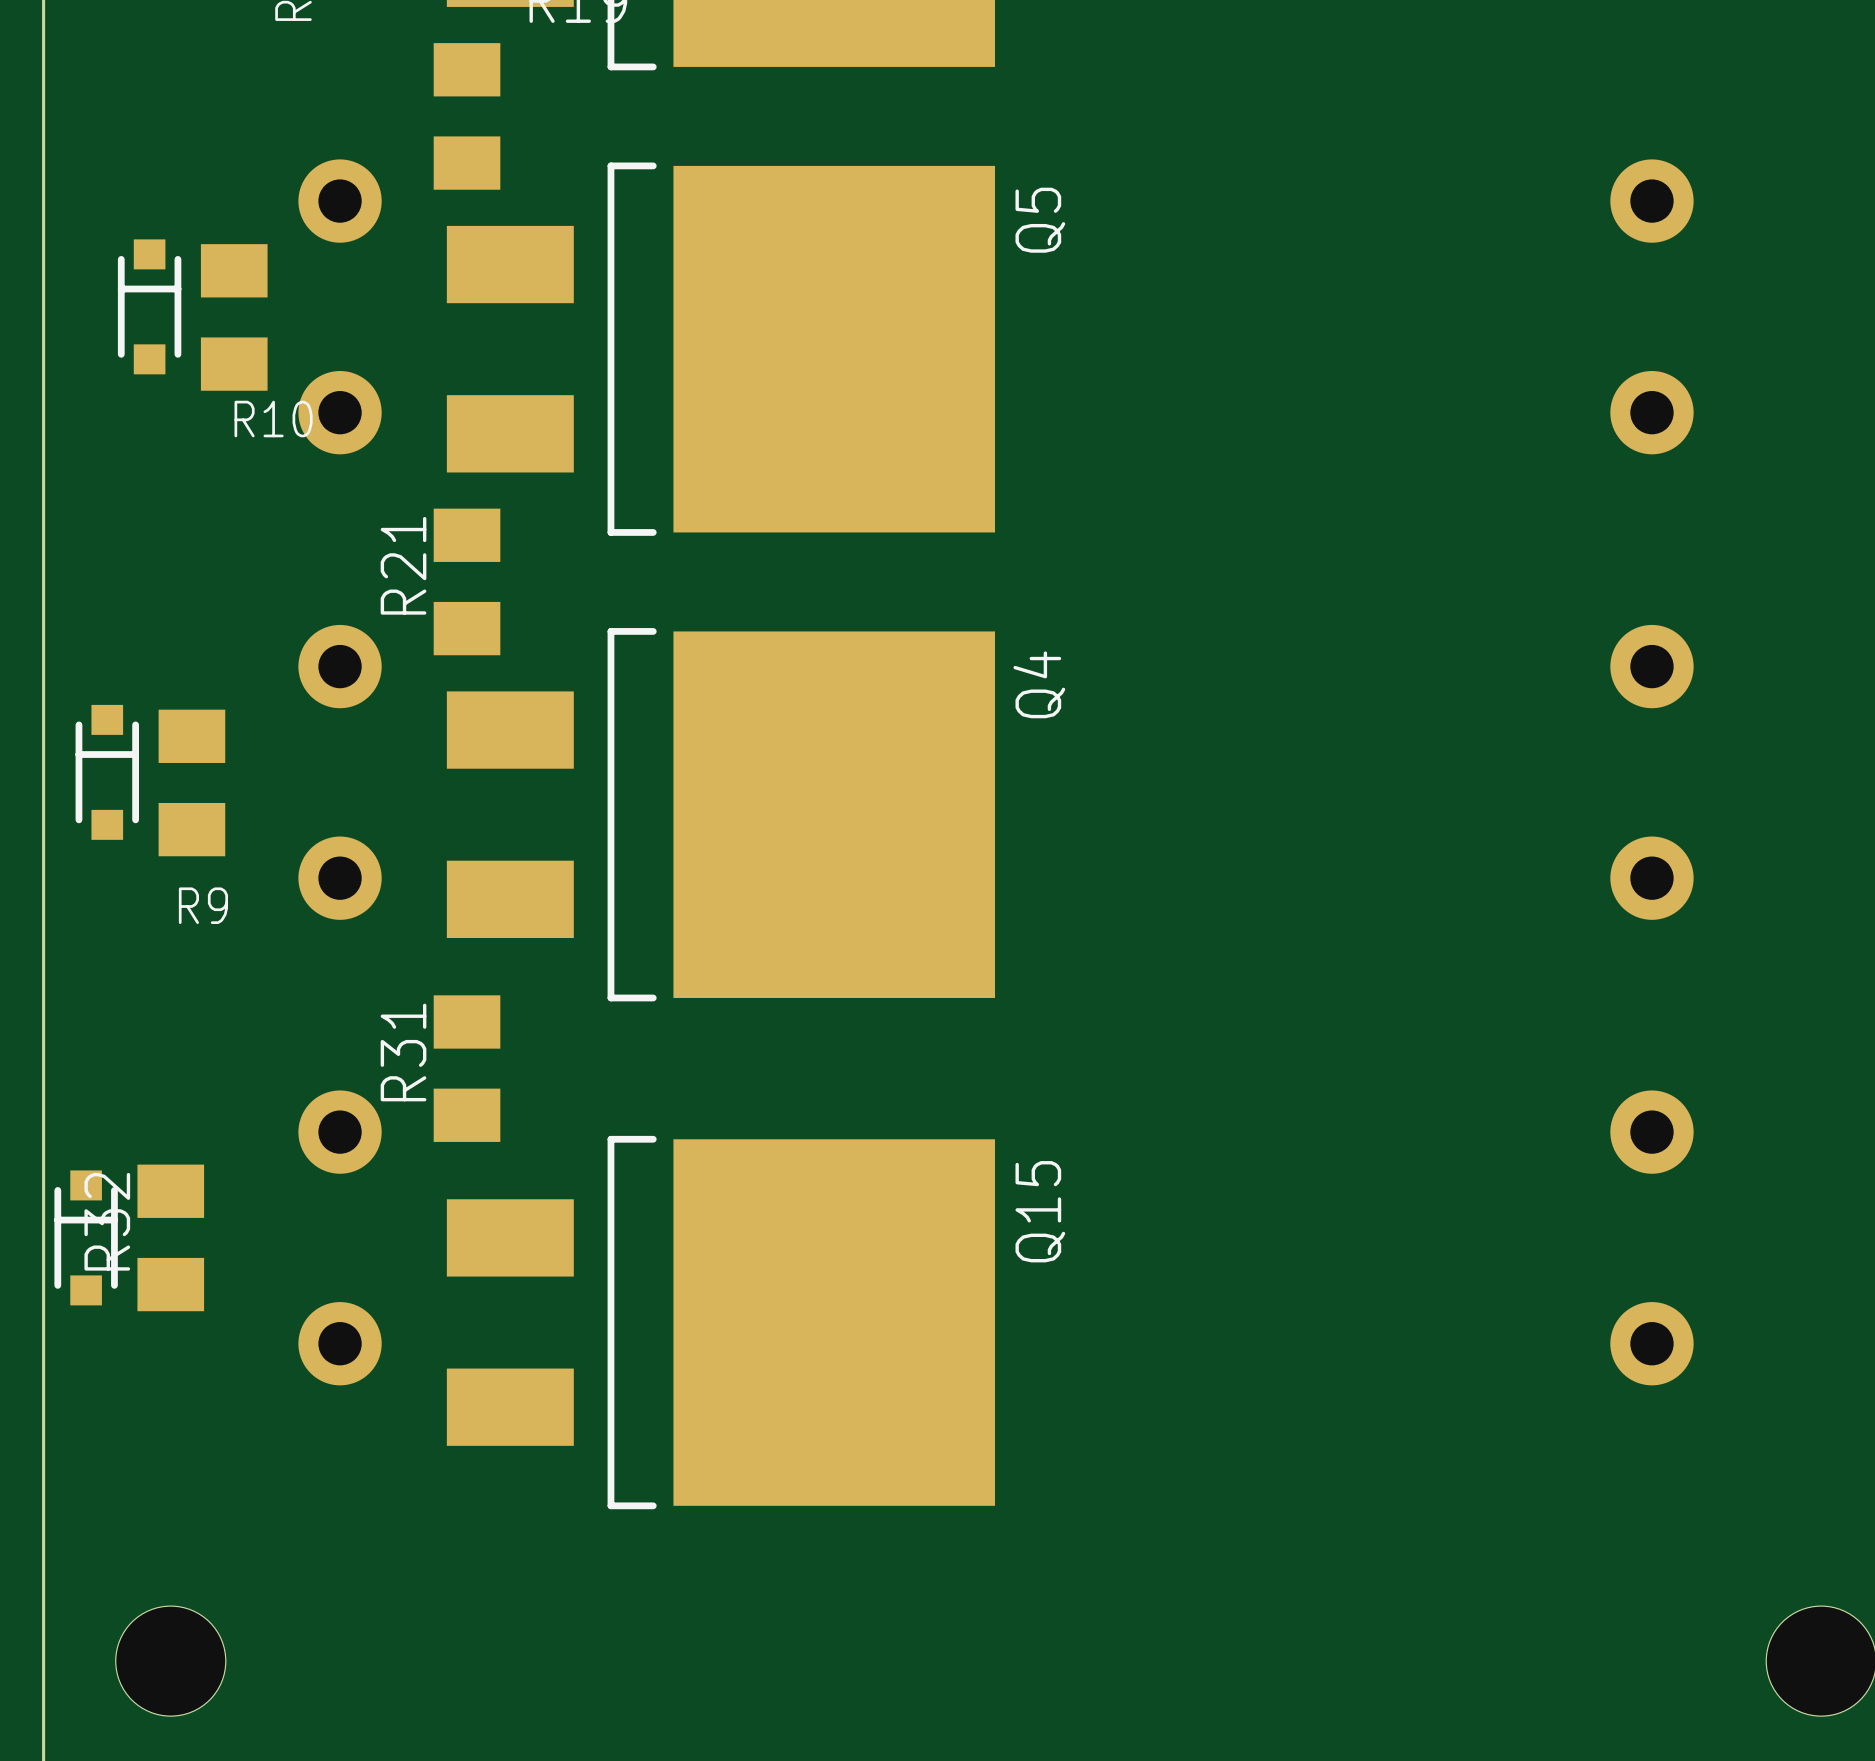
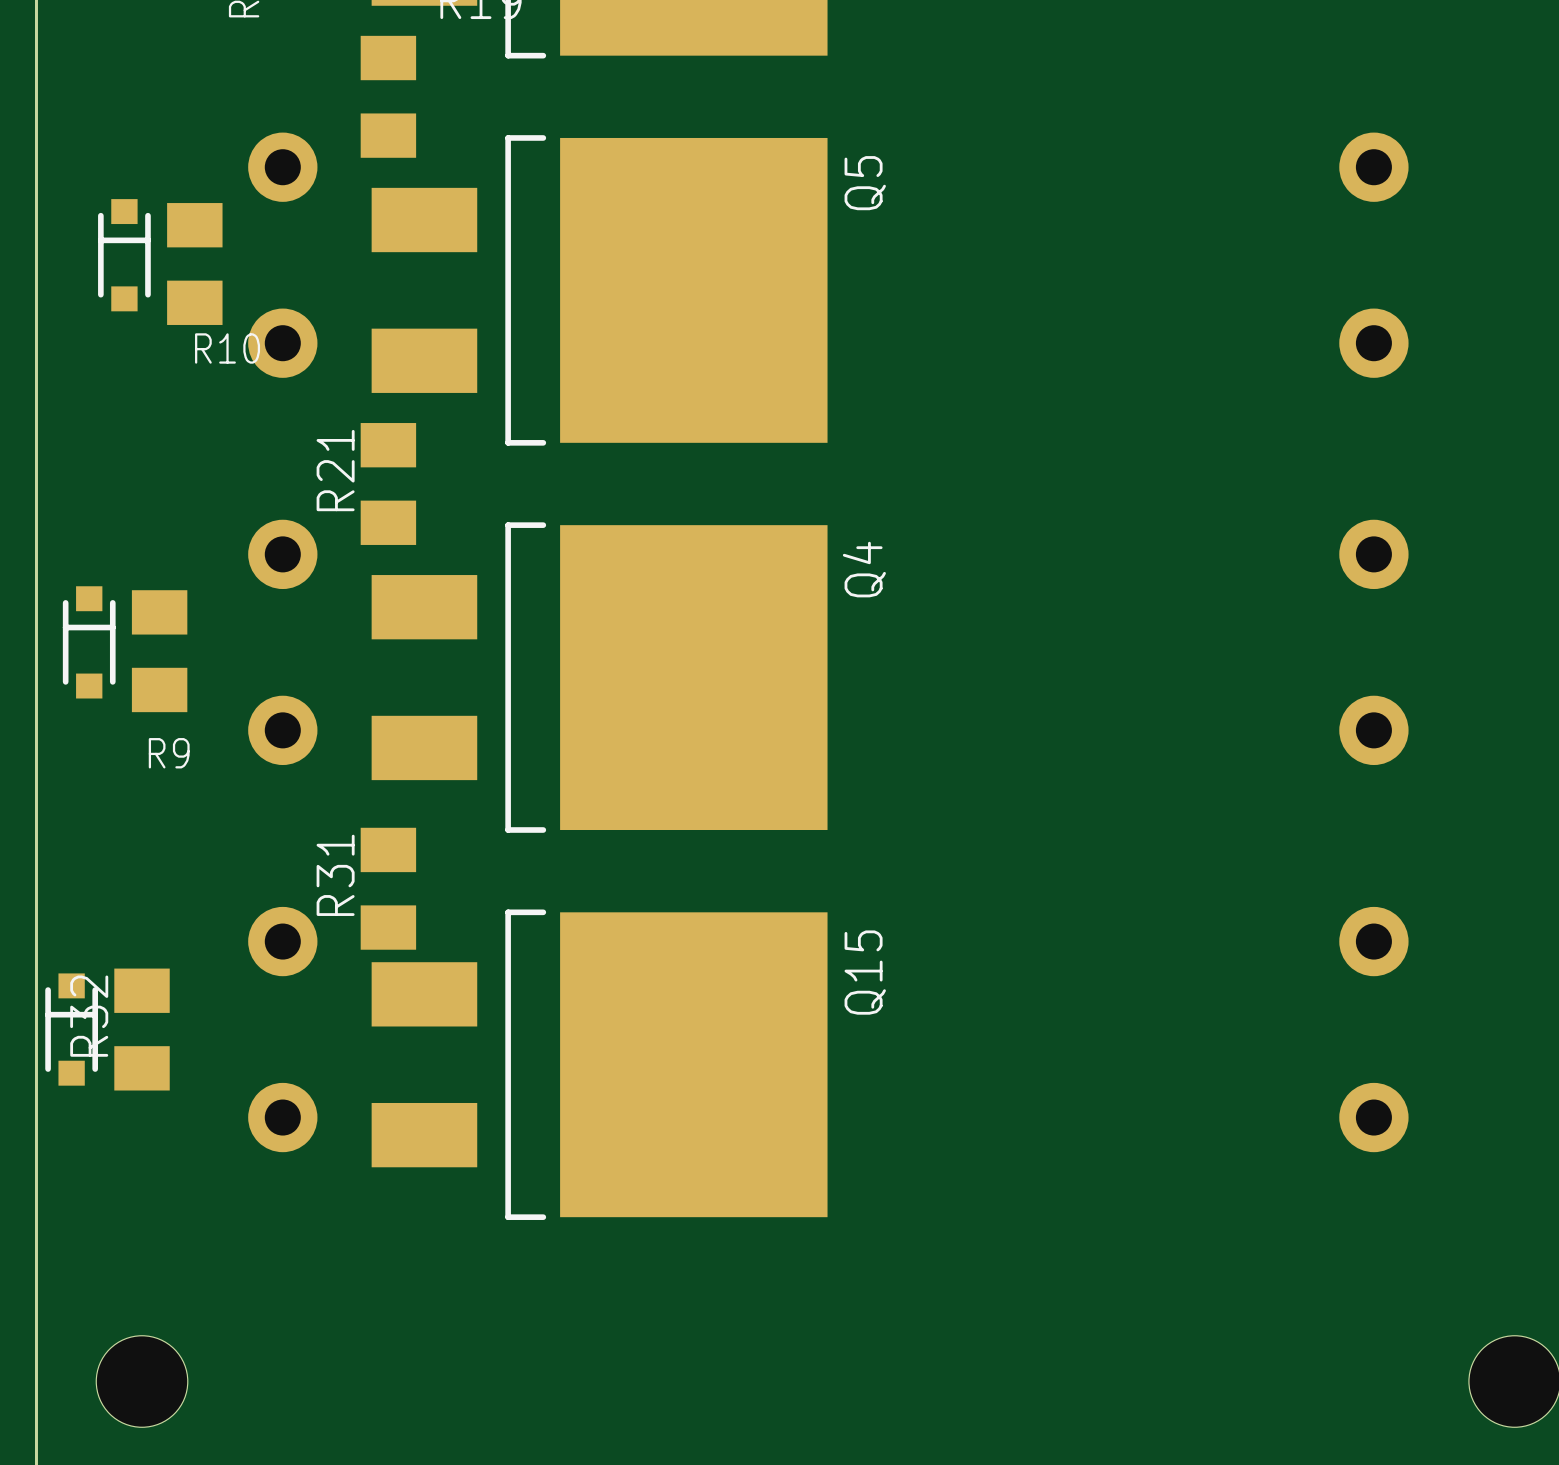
Q15 position: (720, 1322) -> (599, 1064)

